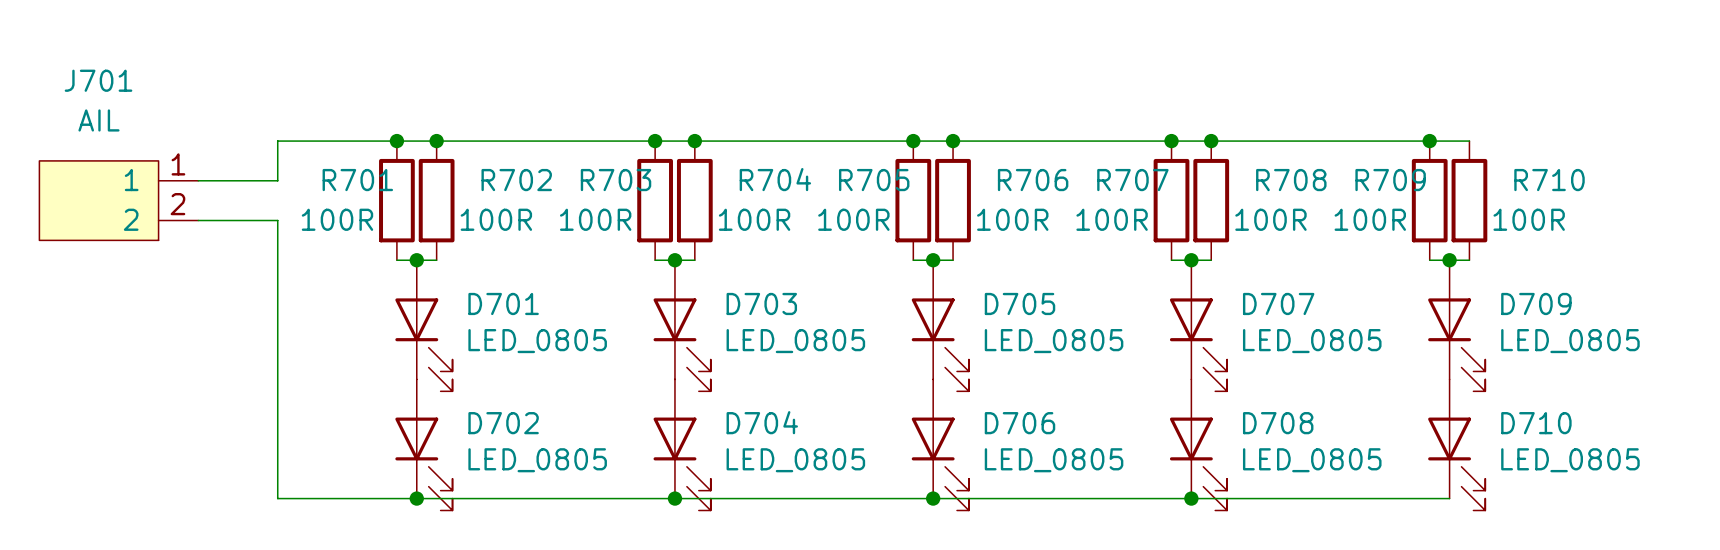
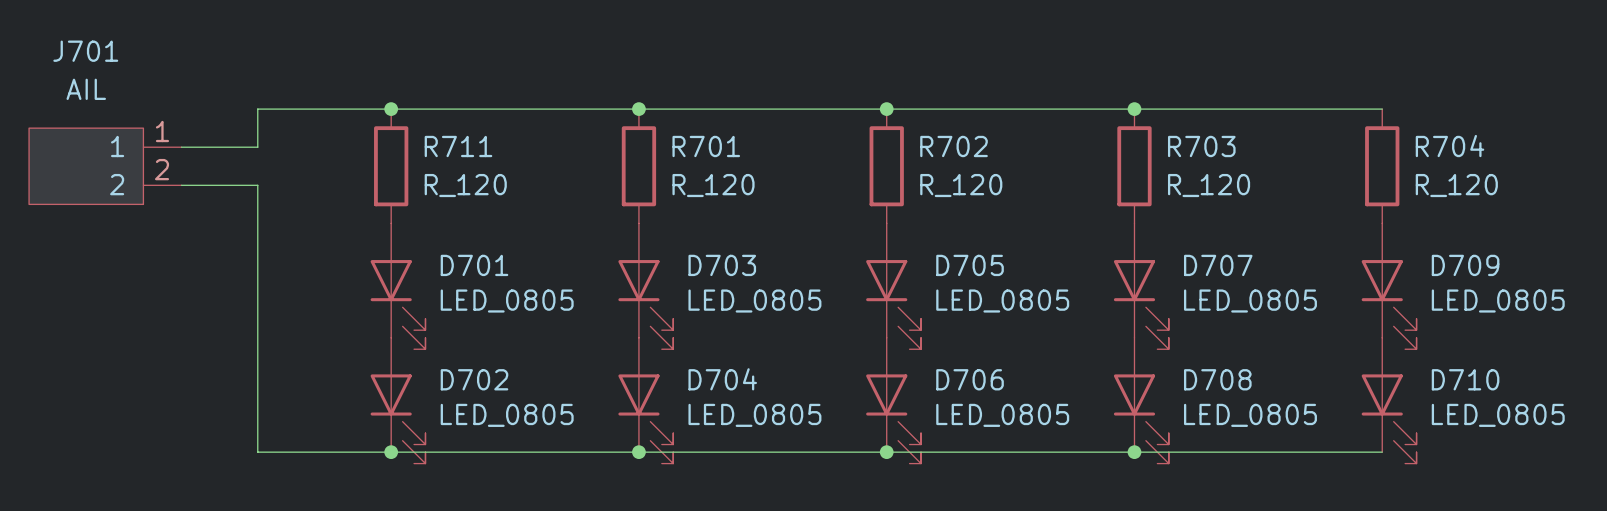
junction: (396, 141) -> none
junction: none -> (391, 109)
junction: (436, 141) -> none
junction: (655, 141) -> none
junction: none -> (638, 109)
junction: (694, 141) -> none
junction: (913, 141) -> none
junction: none -> (886, 109)
junction: (953, 141) -> none
junction: (1171, 141) -> none
junction: none -> (1134, 109)
junction: (1211, 141) -> none
junction: (1429, 141) -> none
wire: (1449, 141) (1469, 141) -> none
R704 name position: R704 (775, 179) -> R704 (1450, 146)
R701 name position: R701 (357, 180) -> R701 (706, 146)
R702 name position: R702 (516, 180) -> R702 (954, 146)
R703 name position: R703 (616, 180) -> R703 (1201, 146)
R701 position: (396, 200) -> (638, 166)
R711: none -> R_120 (391, 166)
R702 position: (436, 200) -> (886, 166)
R703 position: (655, 200) -> (1134, 166)
R704 position: (694, 200) -> (1382, 166)
R705: 100R (913, 200) -> none
R706: 100R (953, 200) -> none
R707: 100R (1171, 200) -> none
R708: 100R (1211, 200) -> none
R709: 100R (1429, 200) -> none
R710: 100R (1469, 200) -> none
R701 value: 100R (337, 219) -> R_120 (713, 185)
R702 value: 100R (496, 219) -> R_120 (961, 185)
R703 value: 100R (595, 219) -> R_120 (1209, 185)
R704 value: 100R (754, 219) -> R_120 (1456, 185)
wire: (396, 260) (436, 260) -> none
junction: (416, 260) -> none
wire: (655, 260) (694, 260) -> none
junction: (674, 260) -> none
wire: (913, 260) (953, 260) -> none
junction: (933, 260) -> none
wire: (1171, 260) (1211, 260) -> none
junction: (1191, 260) -> none
wire: (1429, 260) (1469, 260) -> none
junction: (1449, 260) -> none

